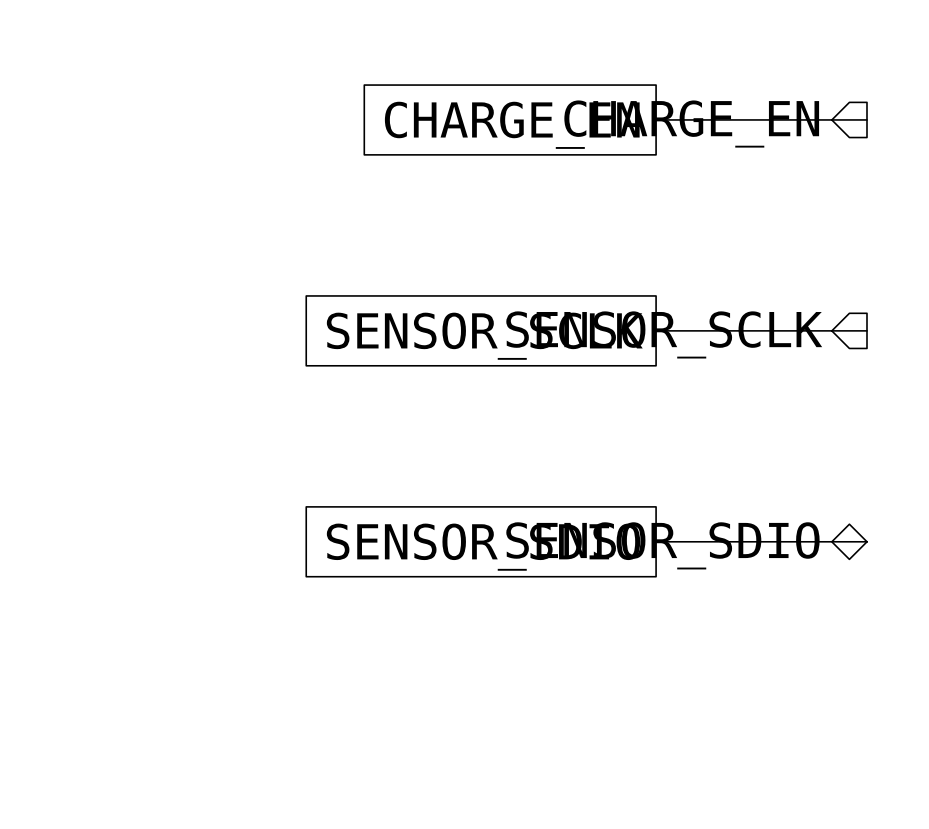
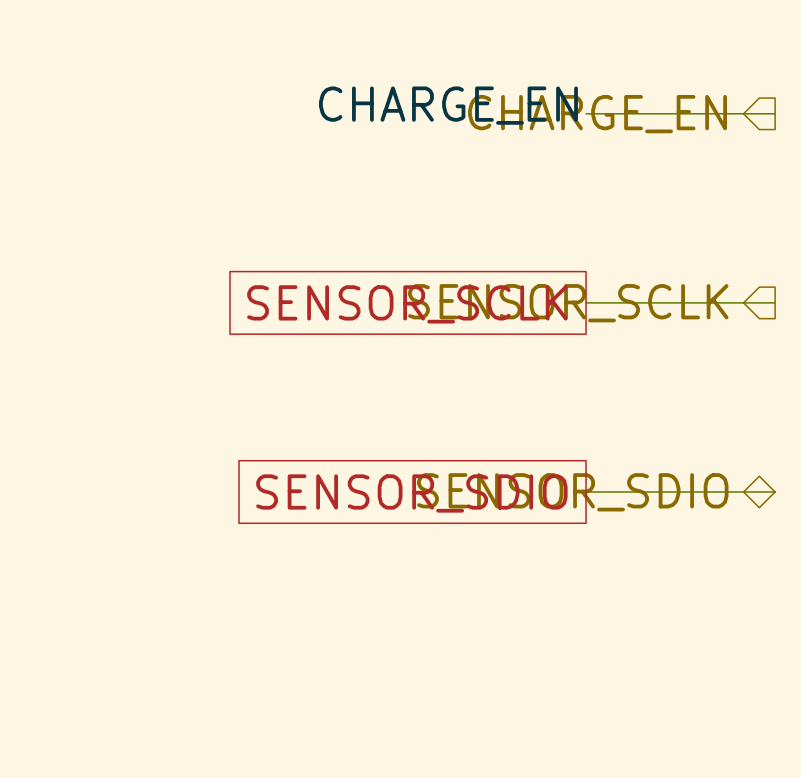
label: none -> CHARGE_EN (448, 105)
global label: CHARGE_EN (512, 125) -> none

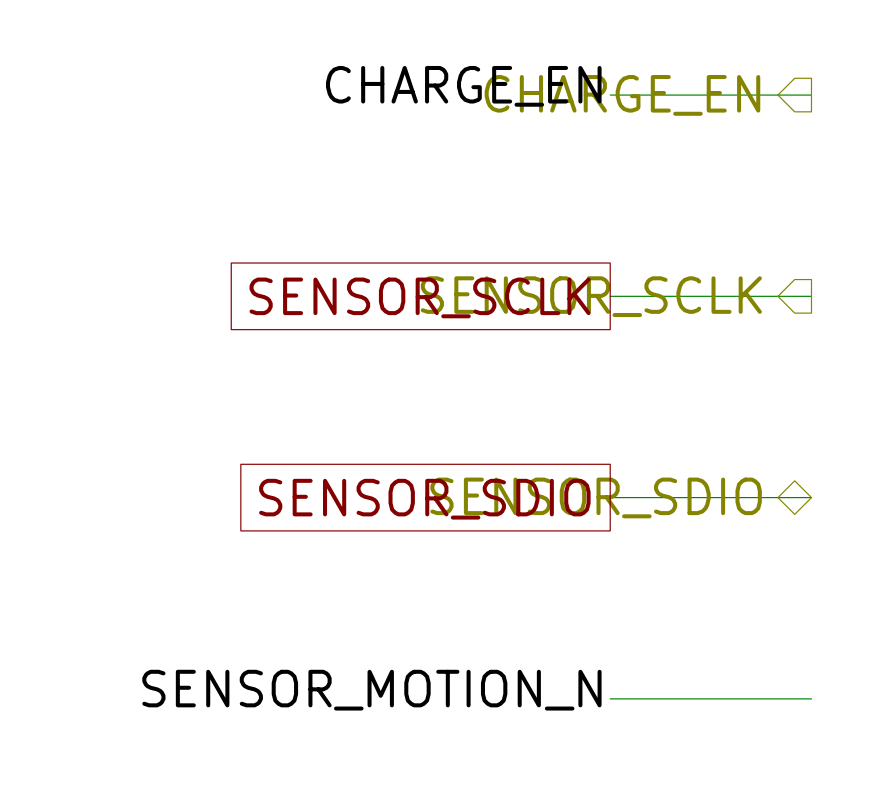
label: none -> SENSOR_MOTION_N (371, 690)
wire: none -> (610, 698) (811, 698)

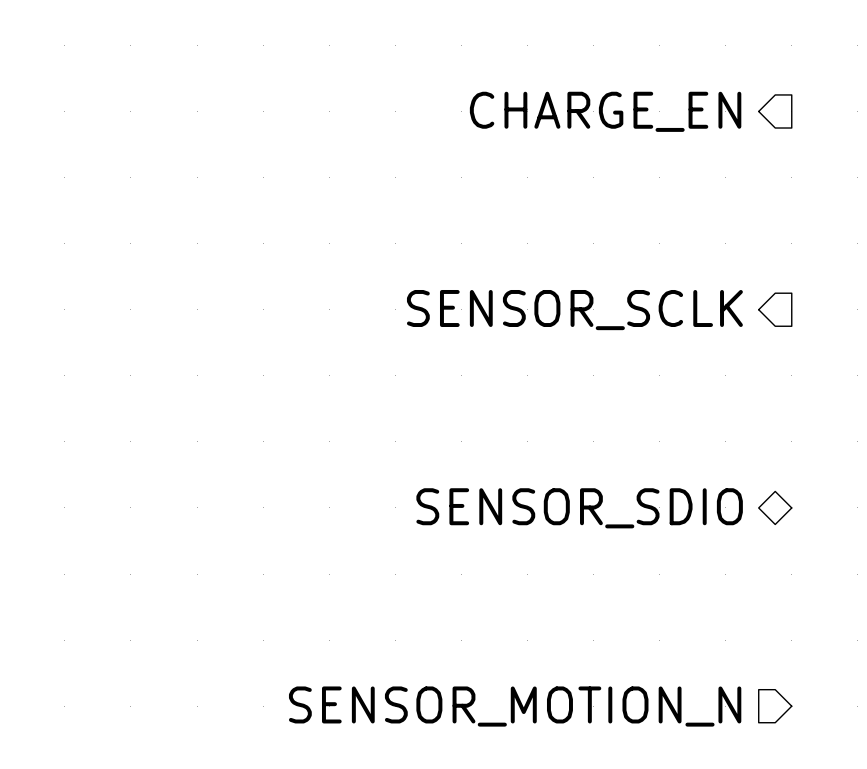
label: CHARGE_EN (463, 86) -> none
wire: (610, 95) (811, 95) -> none
wire: (610, 296) (811, 296) -> none
global label: SENSOR_SCLK (420, 297) -> none
wire: (610, 497) (811, 497) -> none
global label: SENSOR_SDIO (424, 499) -> none
label: SENSOR_MOTION_N (371, 690) -> none
wire: (610, 698) (811, 698) -> none
hierarchical label: none -> SENSOR_MOTION_N (515, 706)

